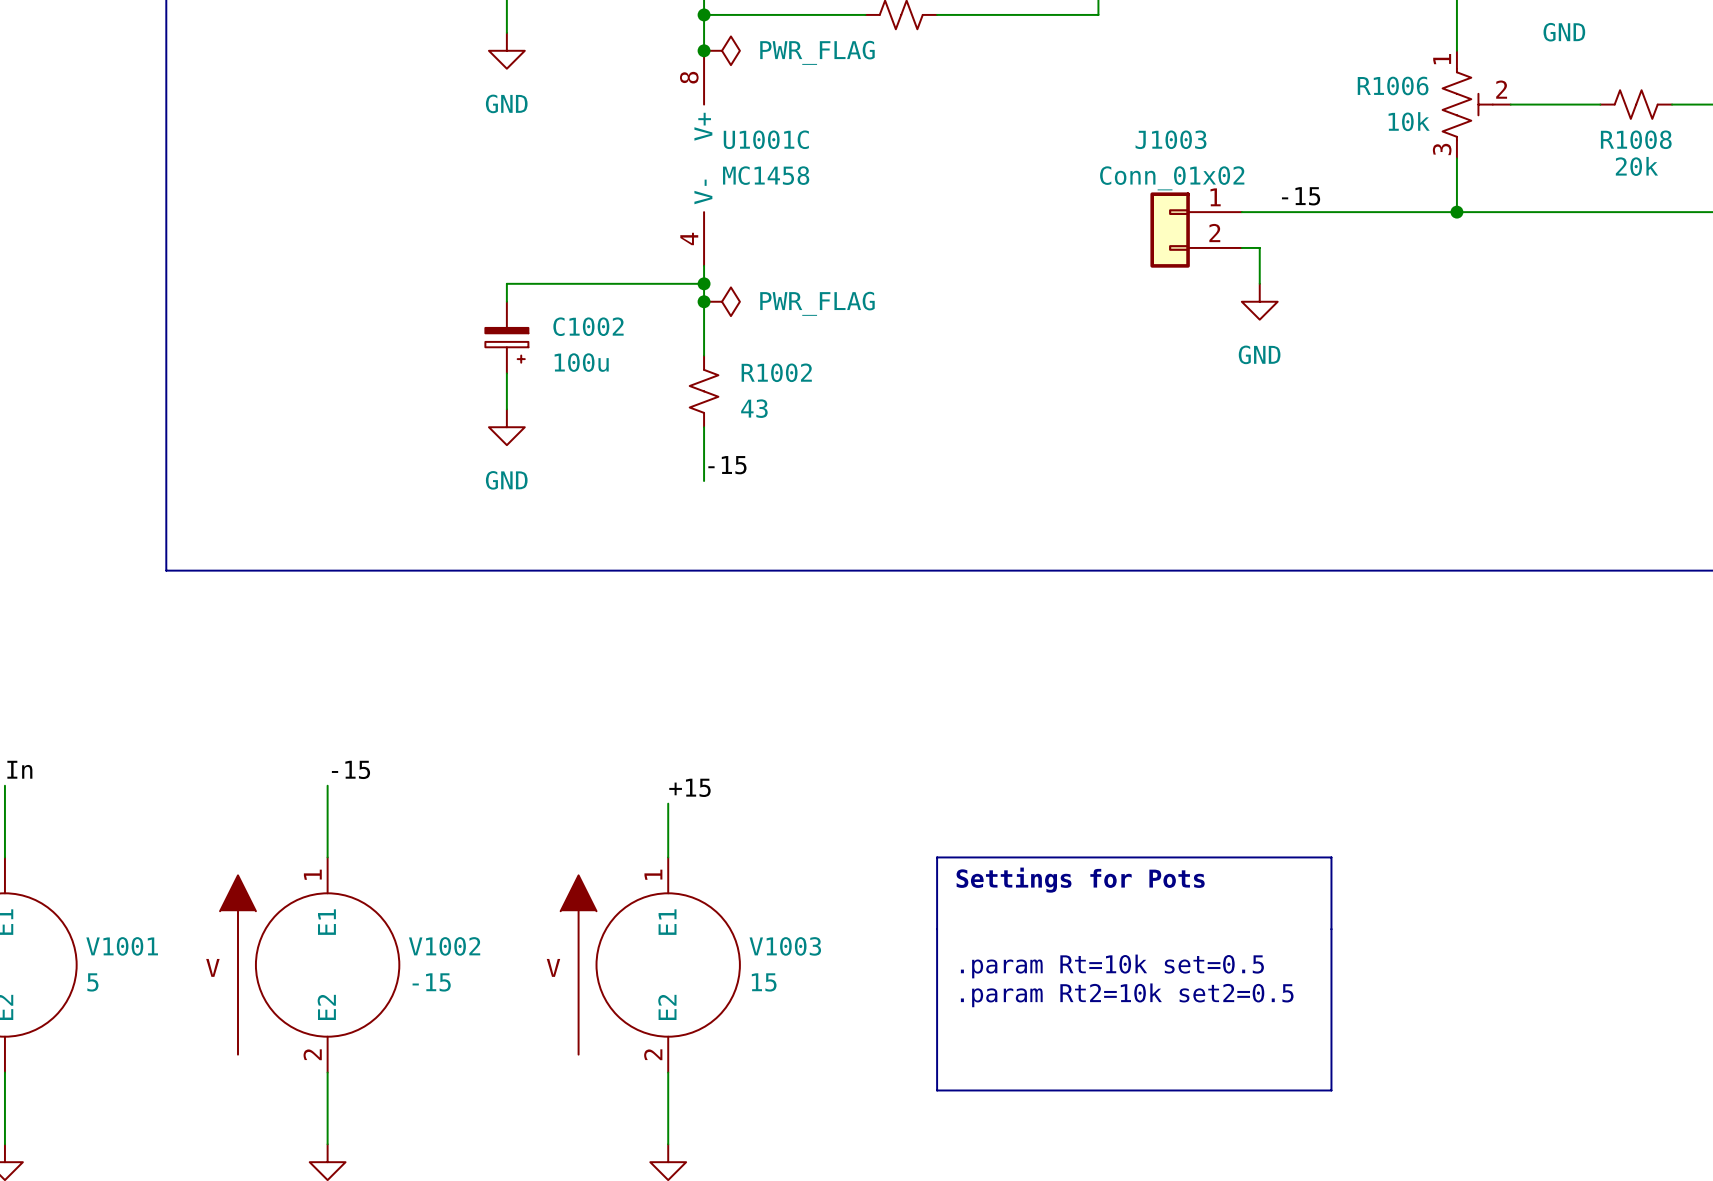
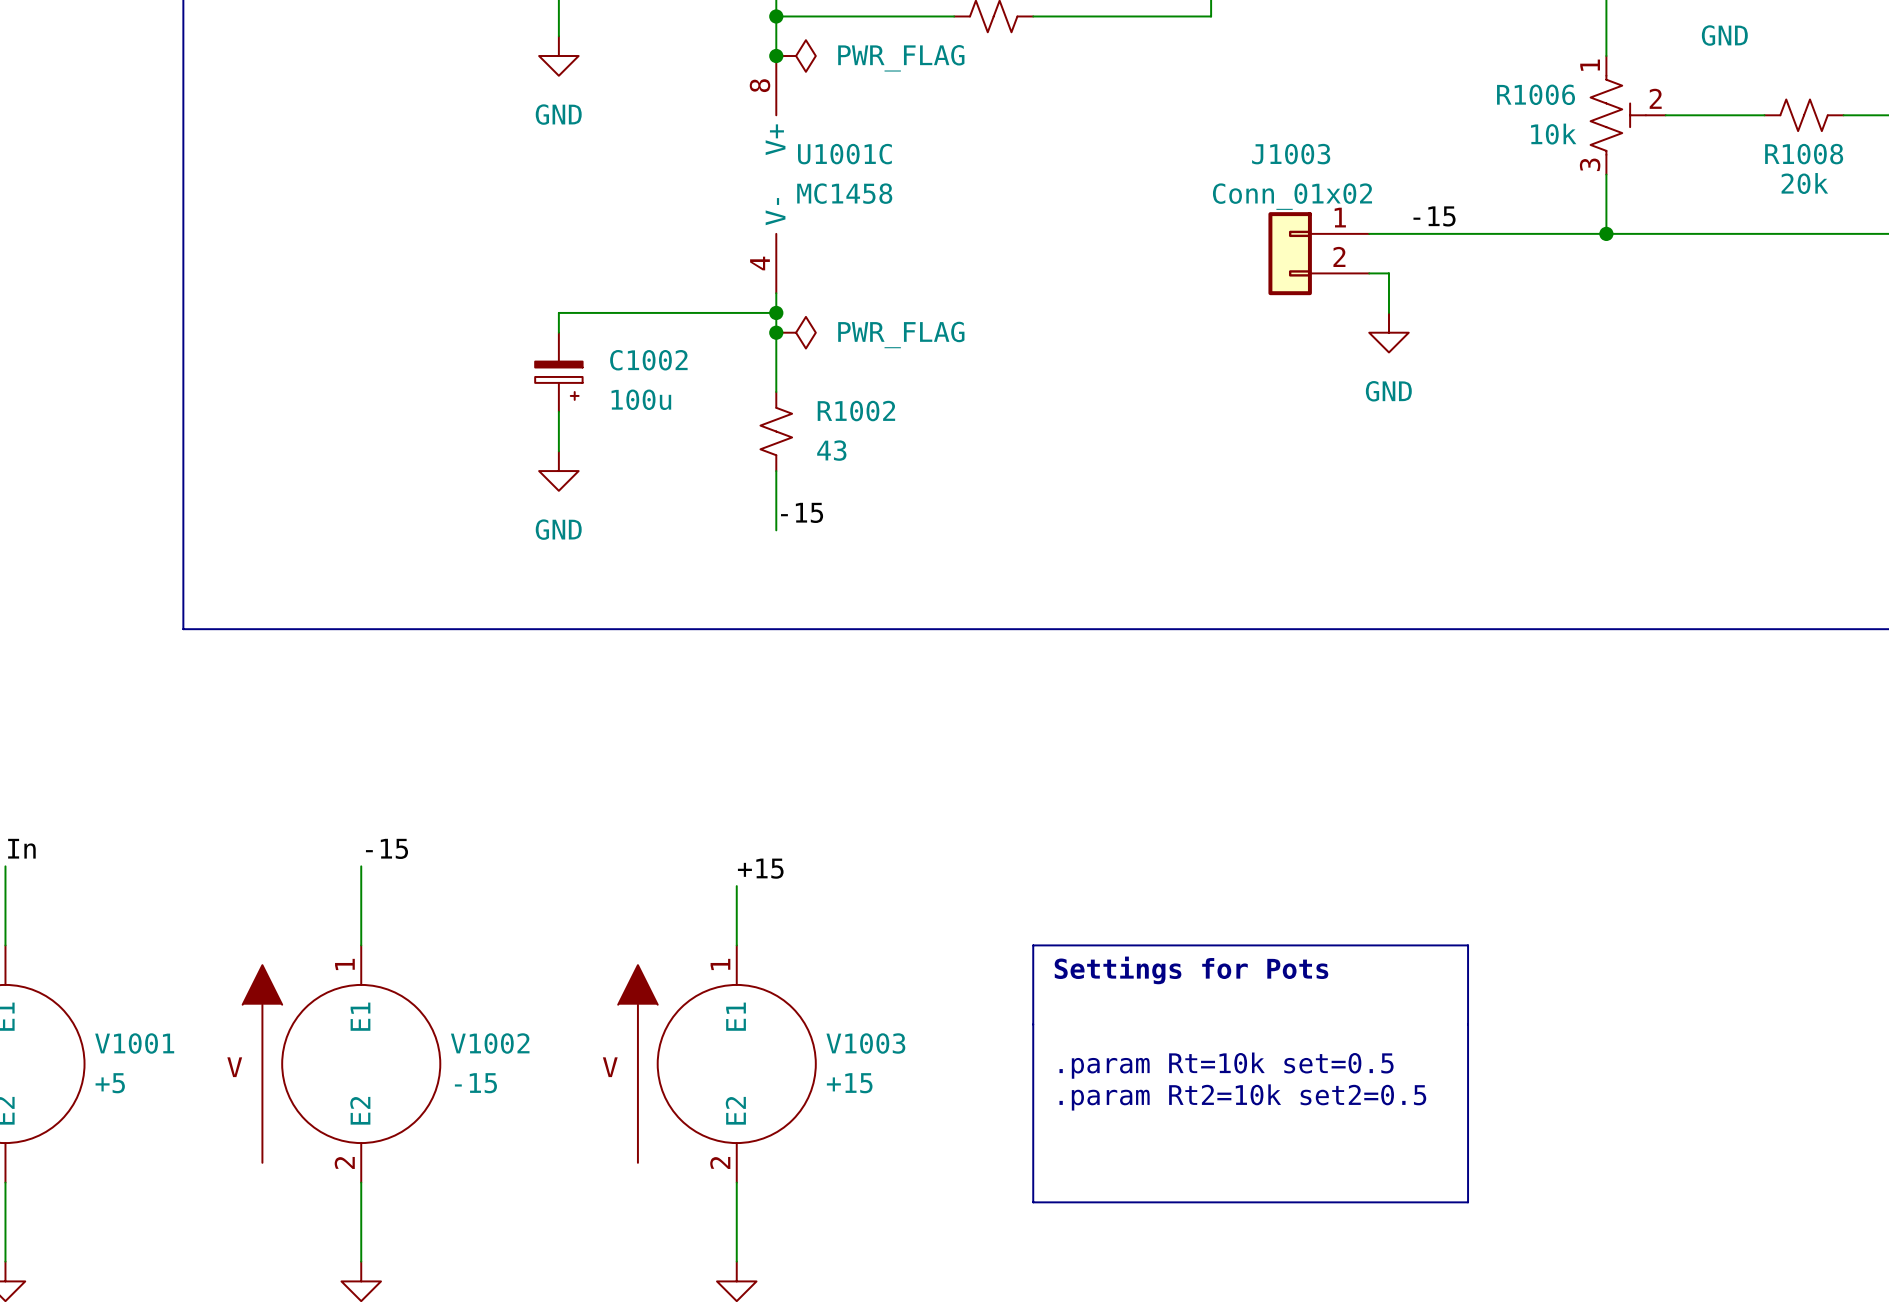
V1001 value: 5 (92, 982) -> +5 (110, 1083)
V1003 value: 15 (764, 982) -> +15 (849, 1083)

